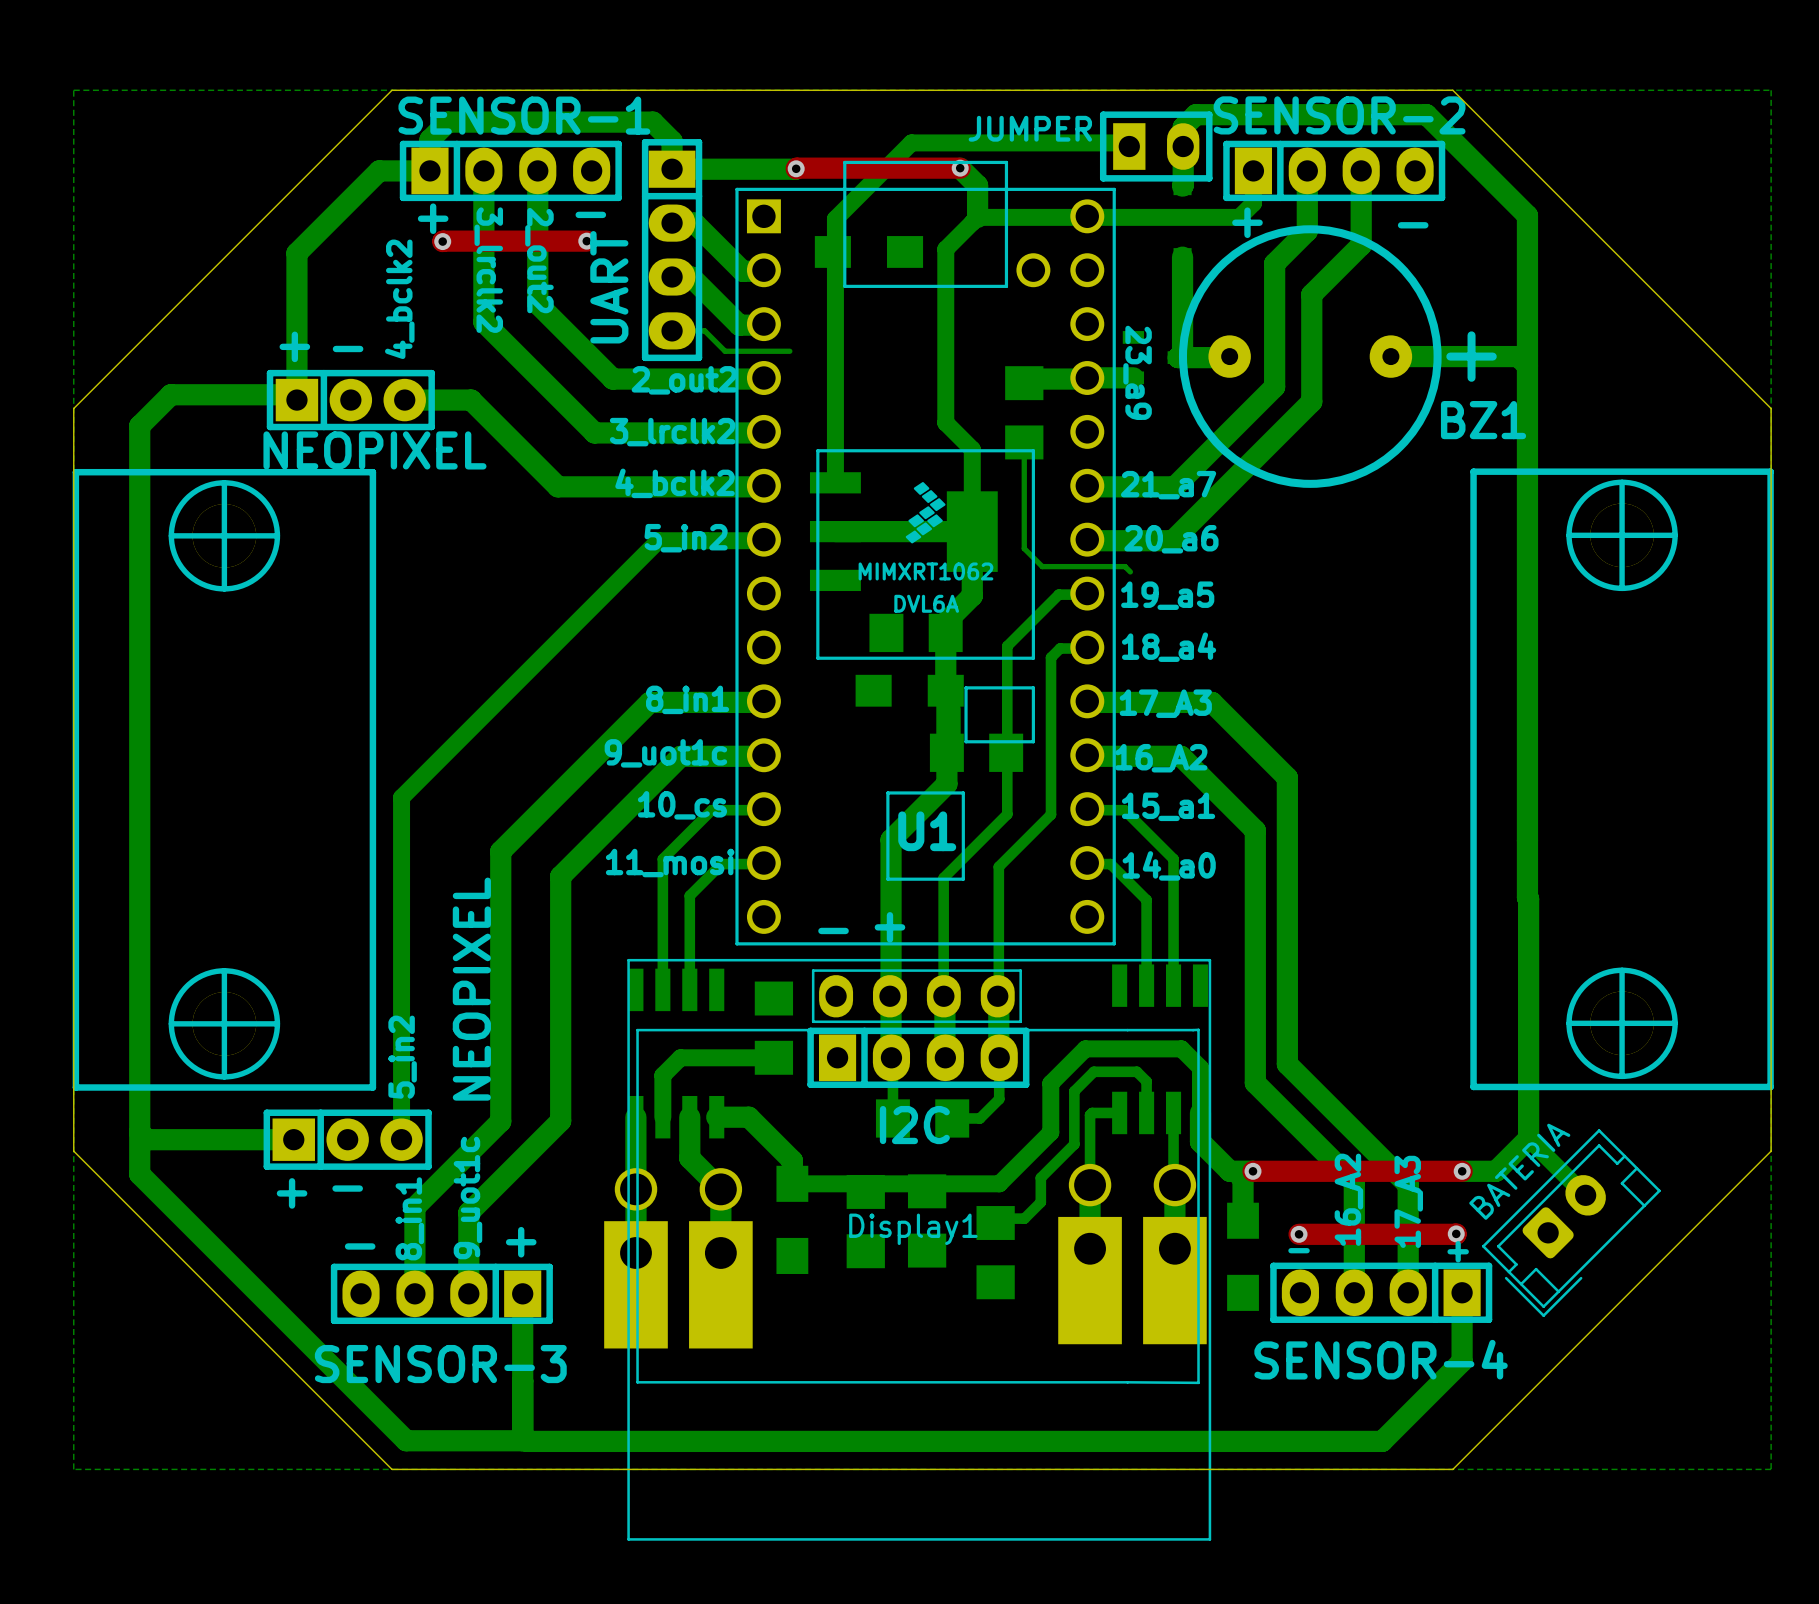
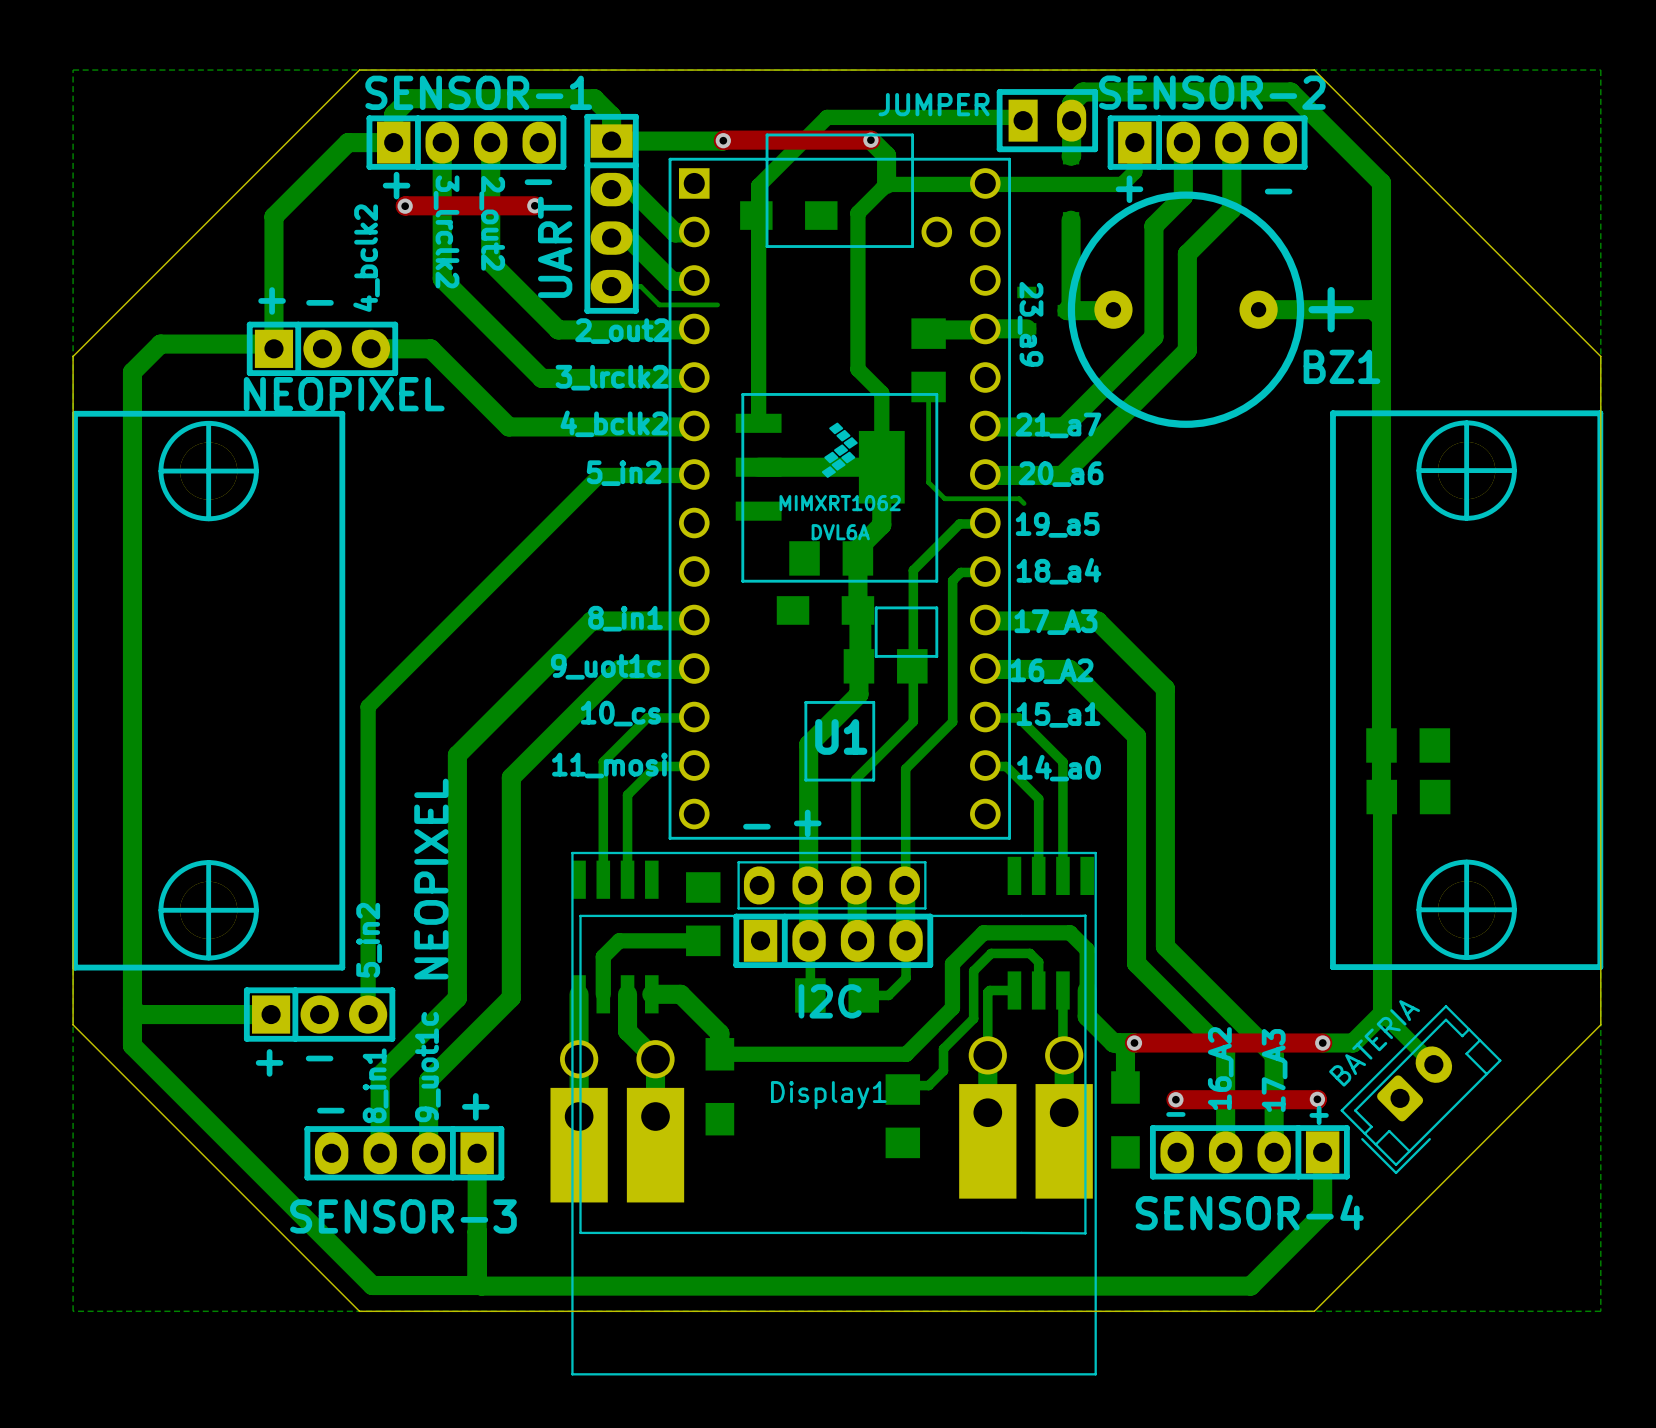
part: none -> (1408, 745)
part: none -> (1408, 797)
part: (927, 1220) -> none
part: (865, 1221) -> none

